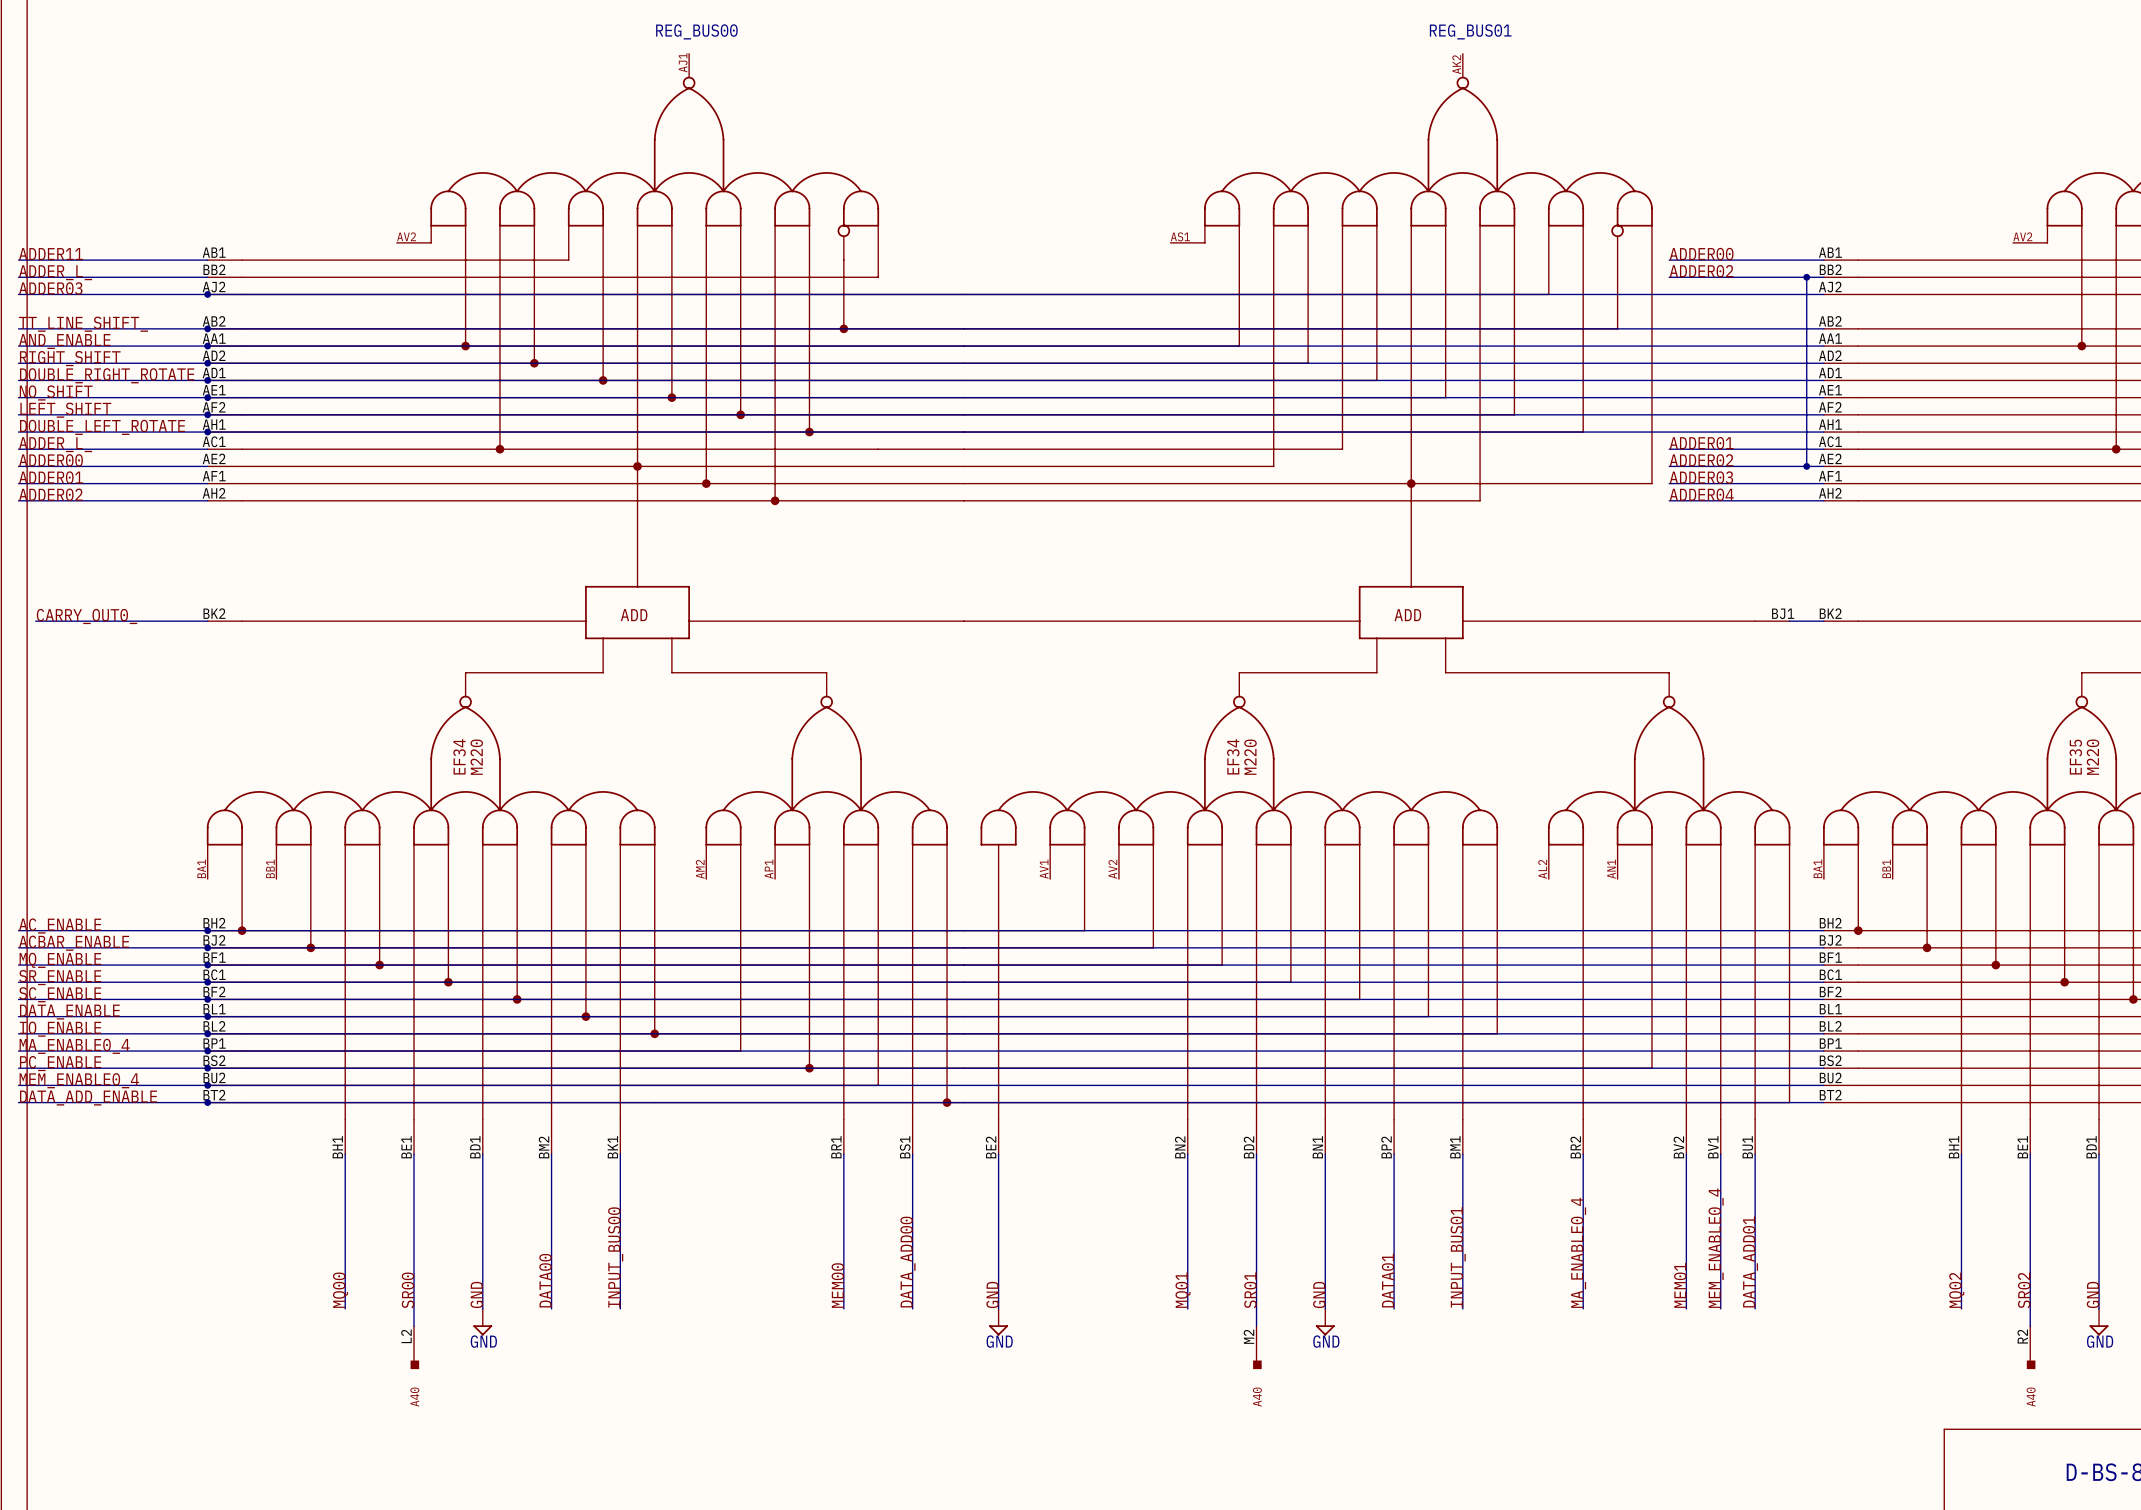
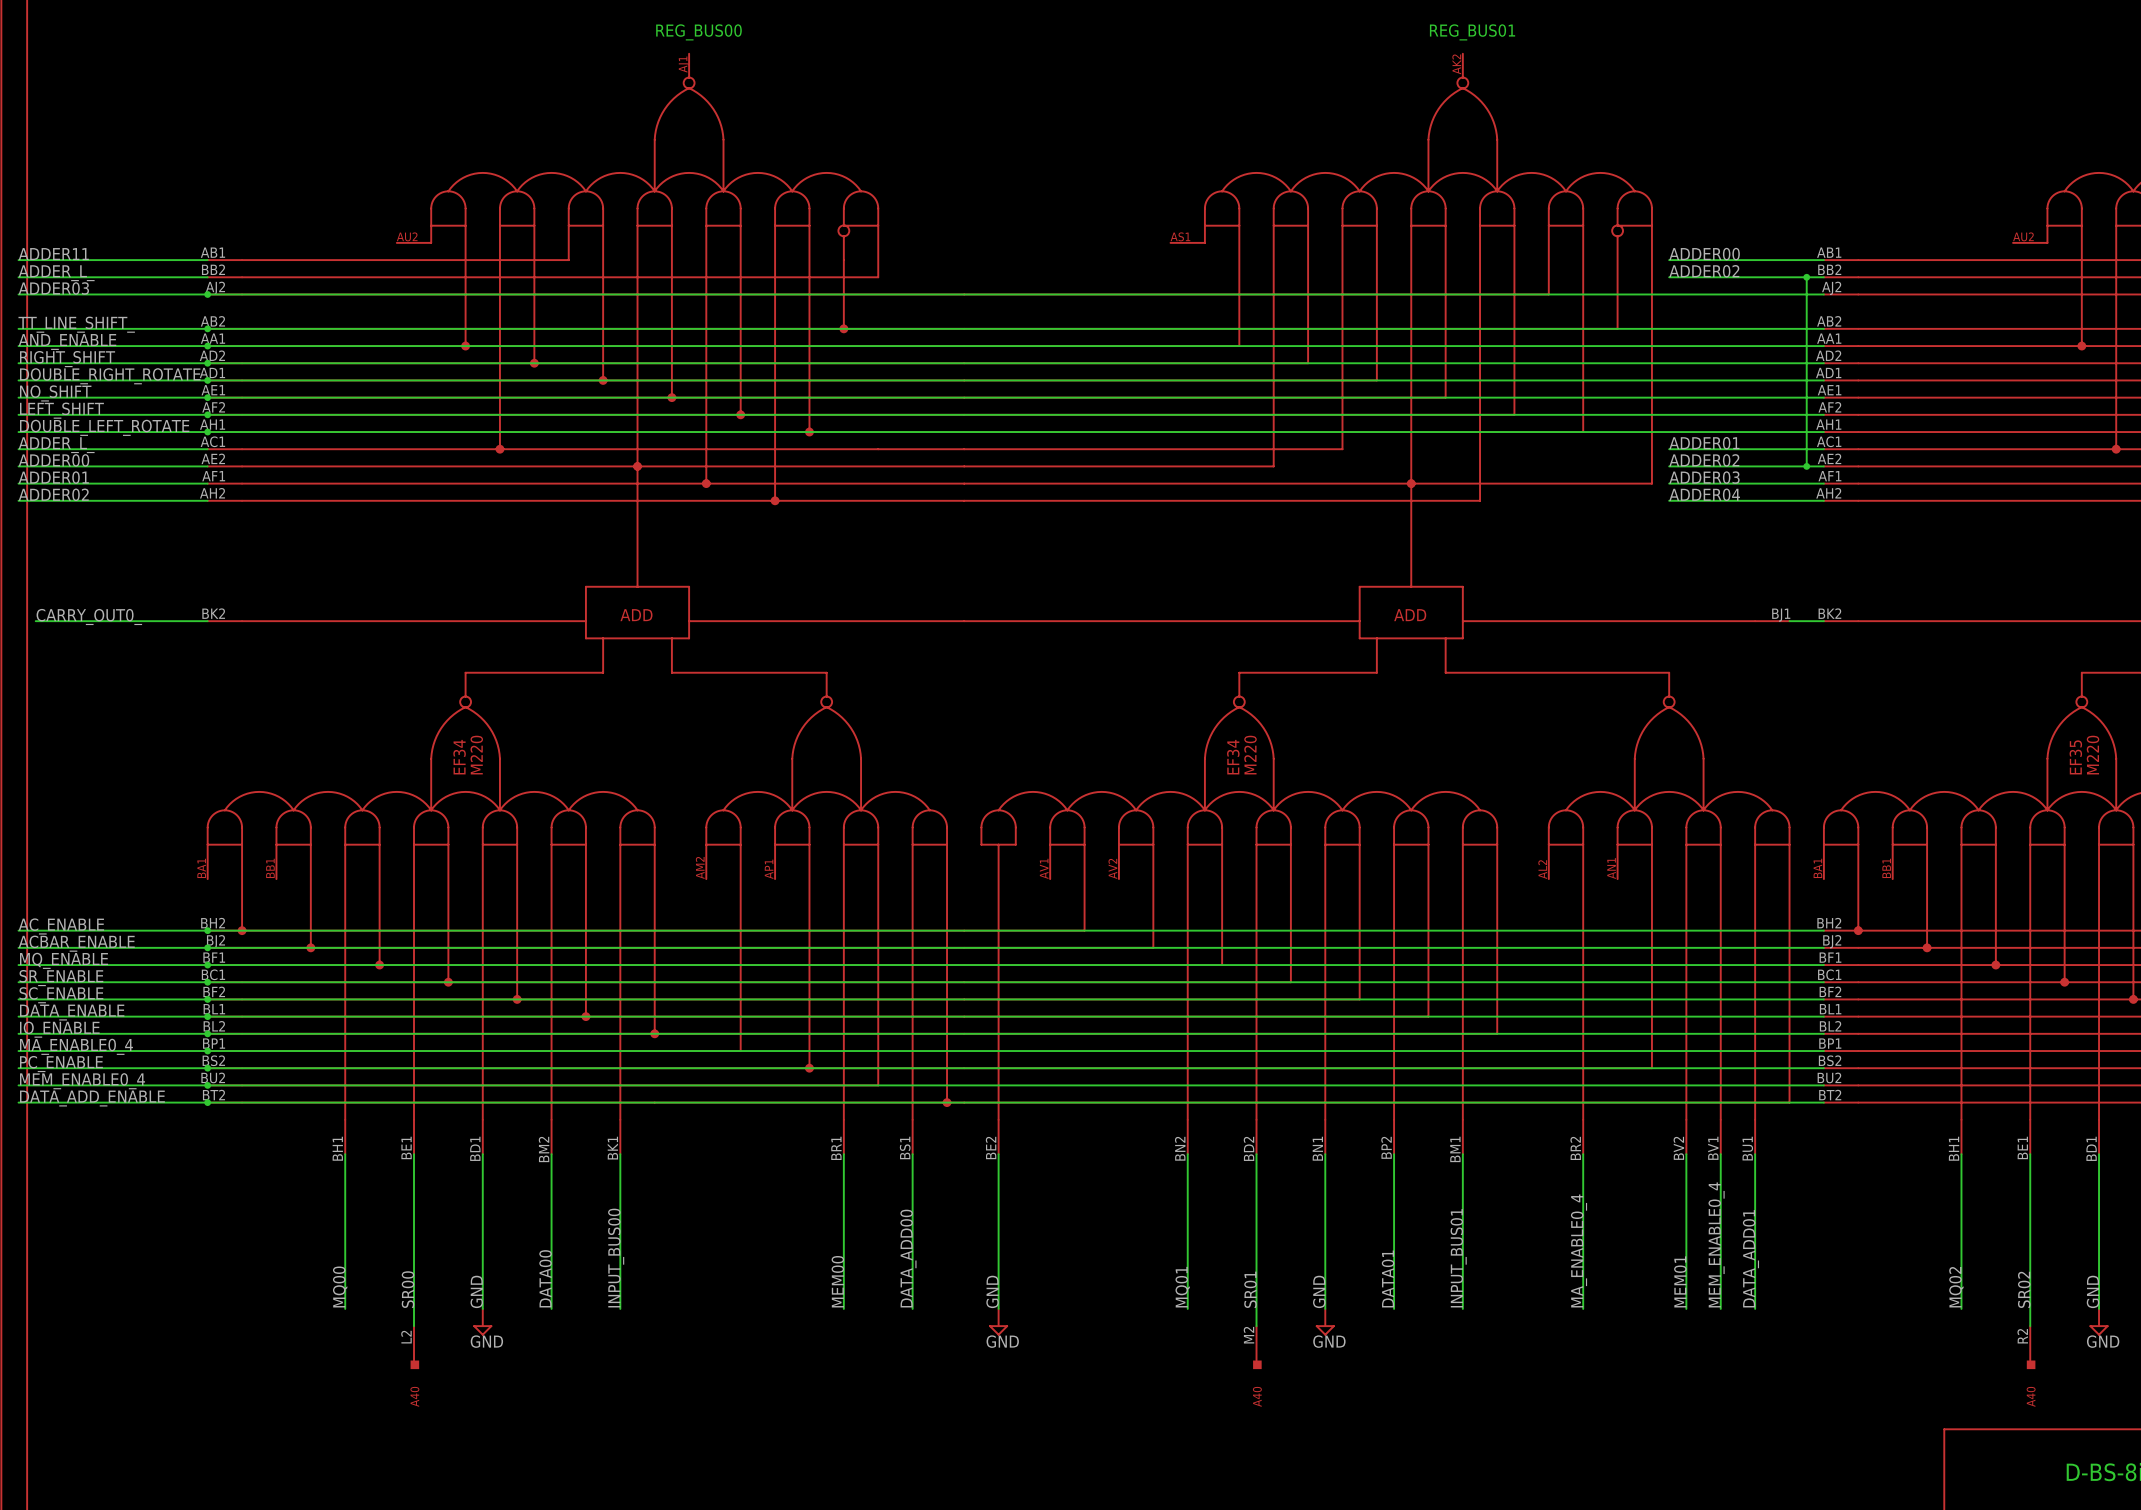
EF34 text: AV2 (406, 236) -> AU2 (407, 236)
EF35 text: AV2 (2022, 236) -> AU2 (2023, 236)

